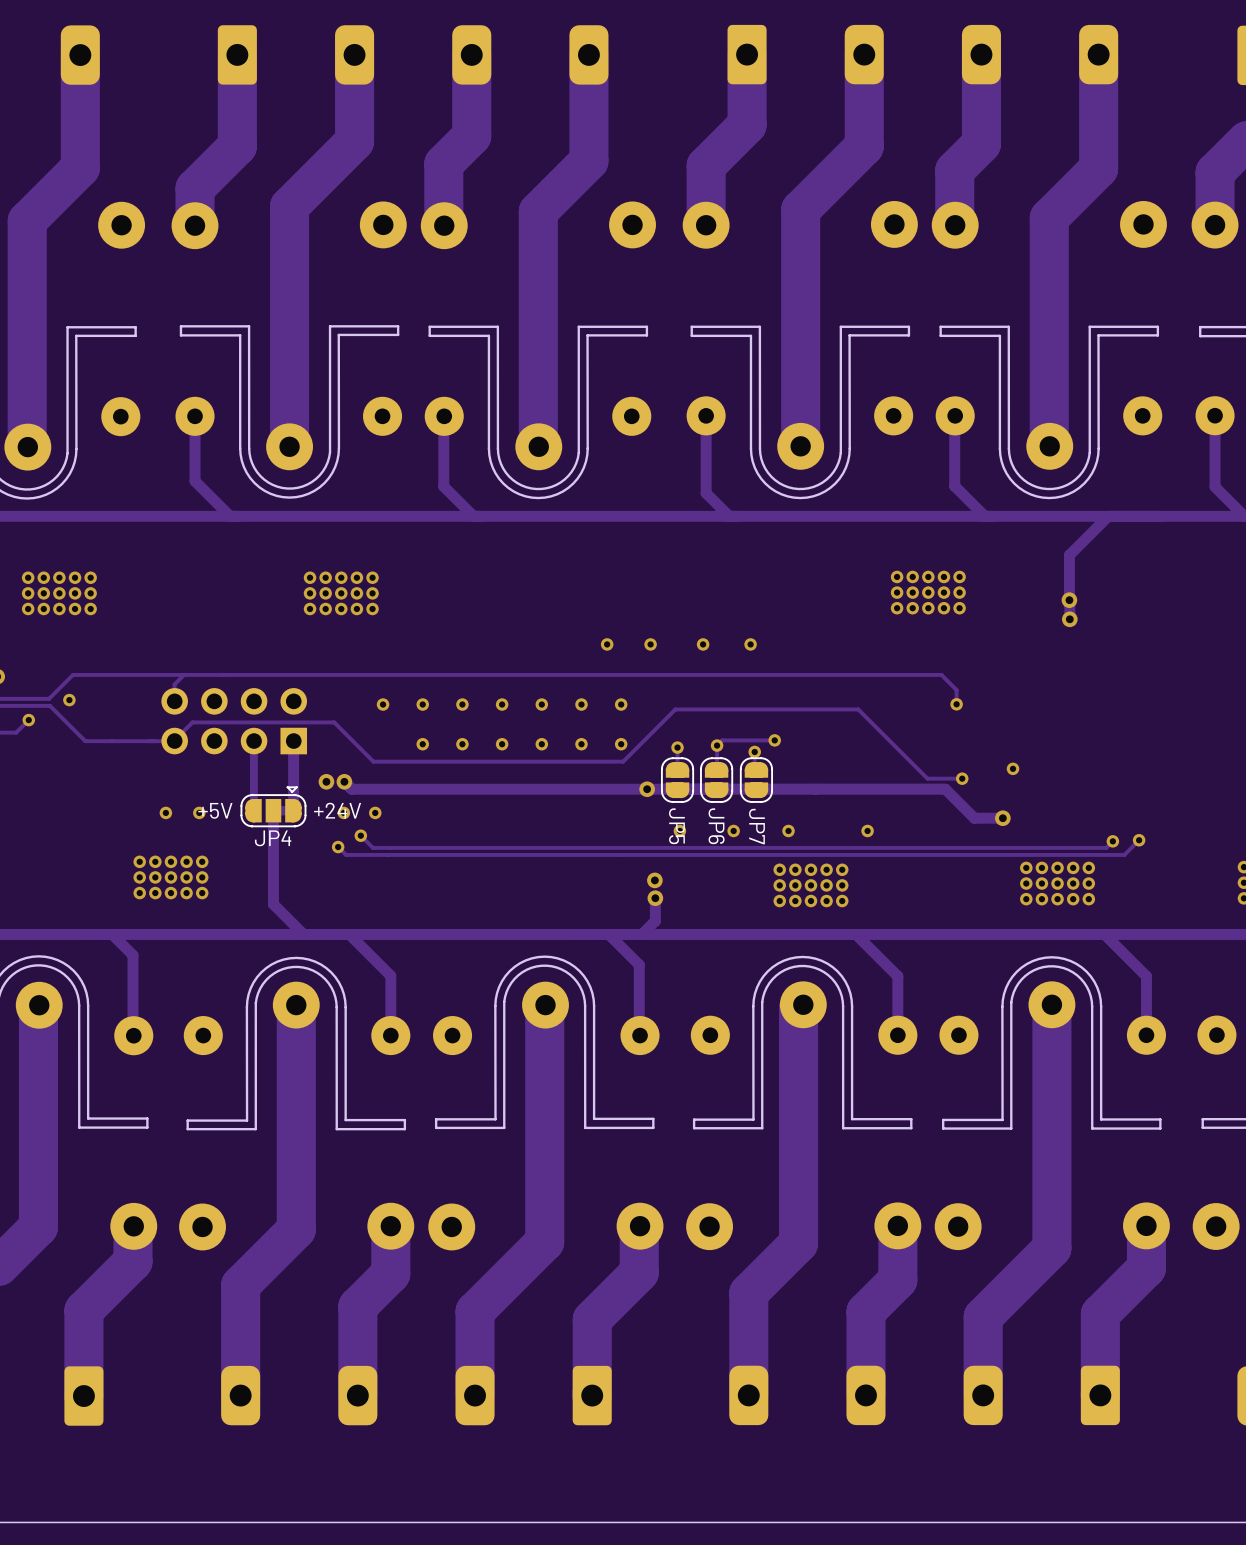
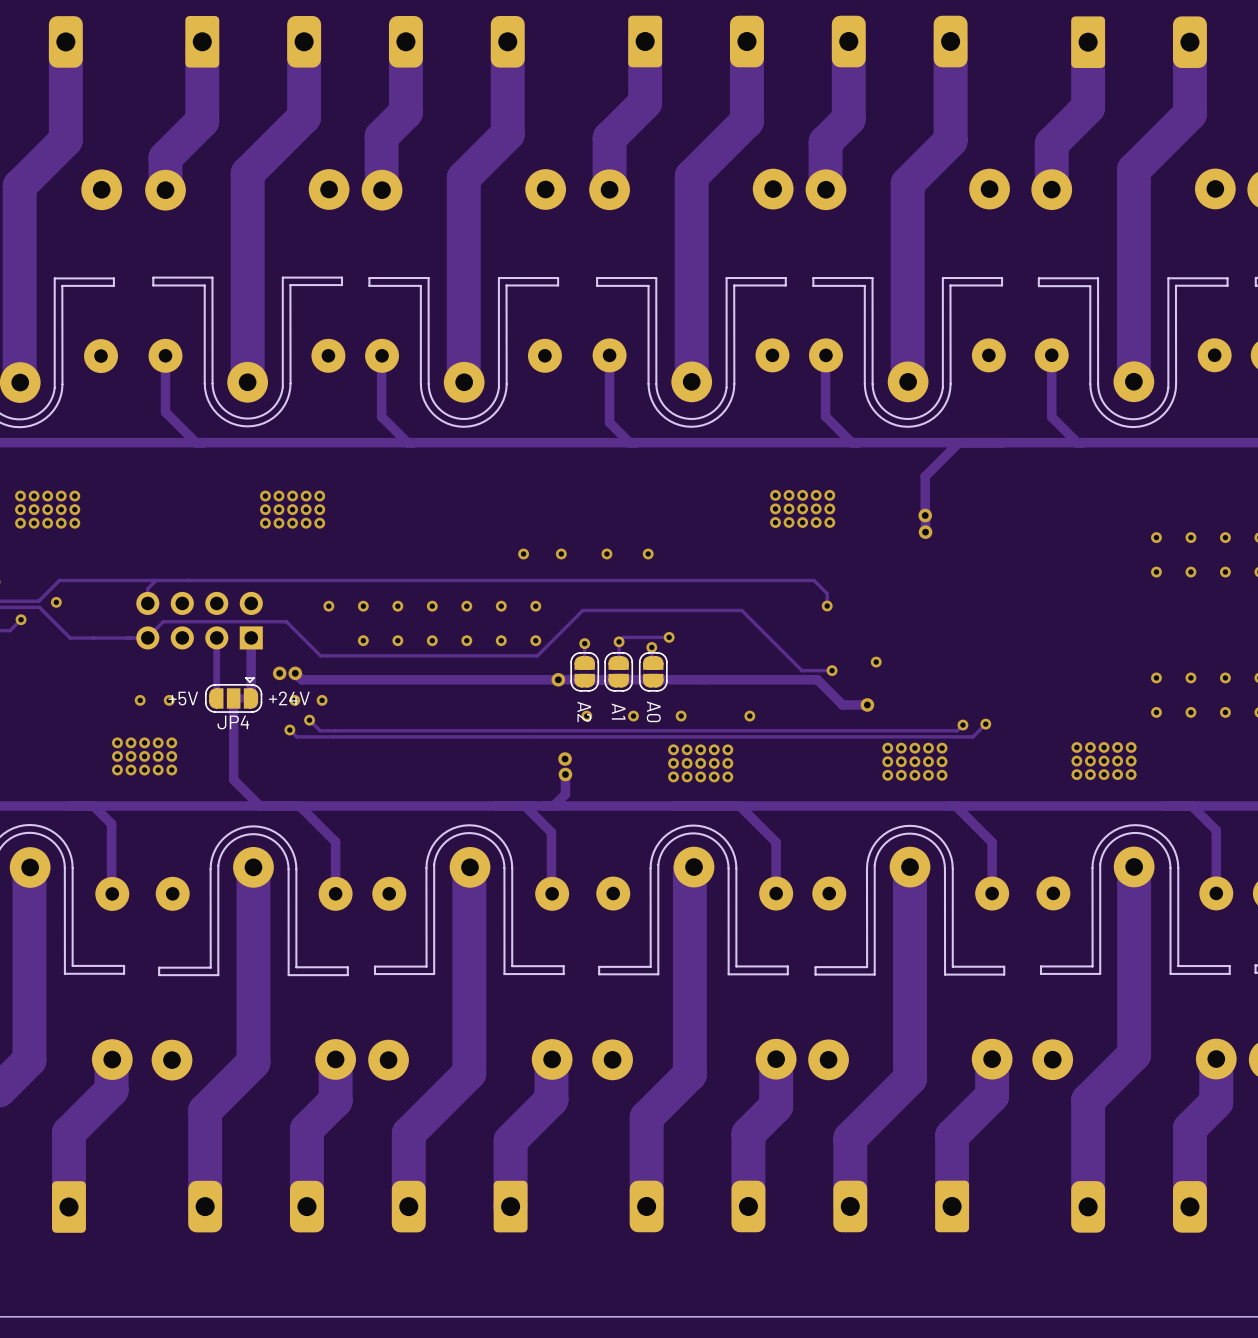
JP5 name: JP5 (676, 826) -> A2 (584, 711)
JP6 name: JP6 (716, 826) -> A1 (618, 711)
JP7 name: JP7 (756, 826) -> A0 (653, 711)

